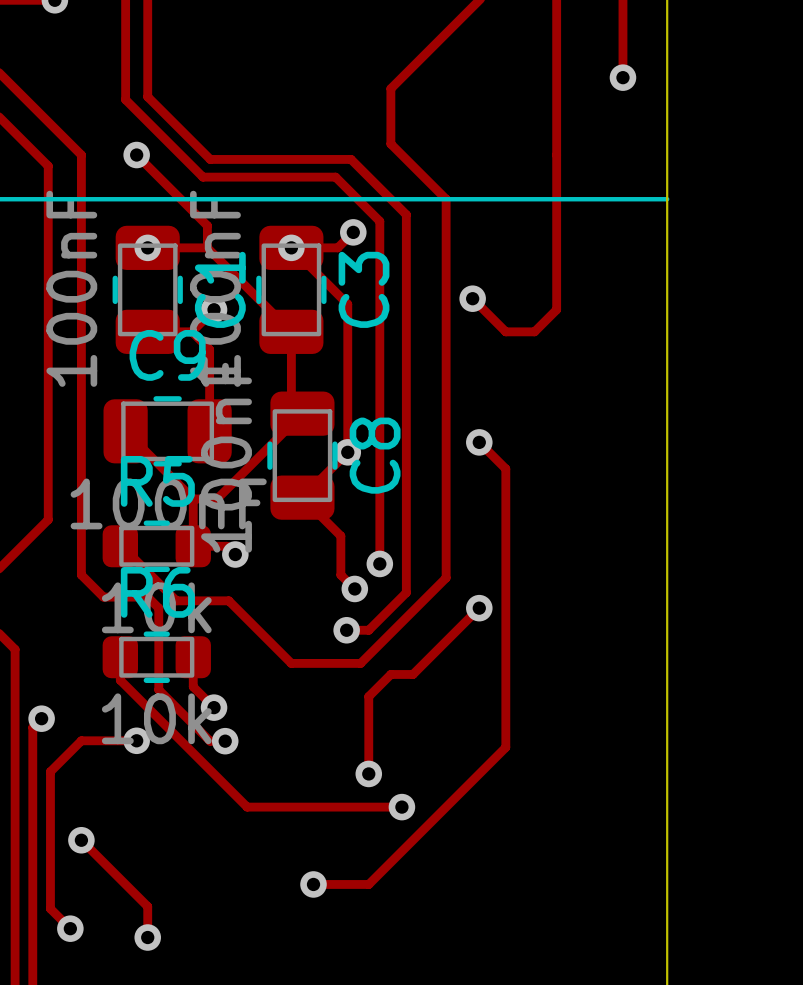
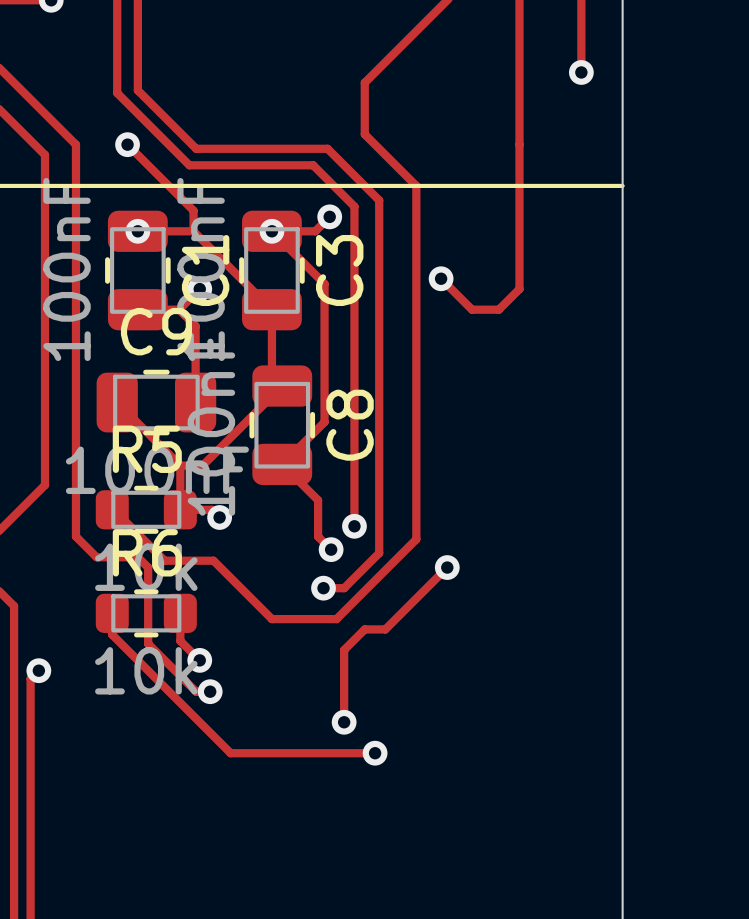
track: (479, 442) (505, 468) (505, 747) (368, 884) (313, 884) -> none
via: (479, 442) -> none
via: (347, 452) -> none
track: (136, 740) (81, 740) (50, 771) (50, 908) (70, 928) -> none
via: (136, 740) -> none
track: (81, 840) (147, 906) (147, 937) -> none
via: (81, 840) -> none
via: (313, 884) -> none
via: (70, 928) -> none
via: (147, 937) -> none

